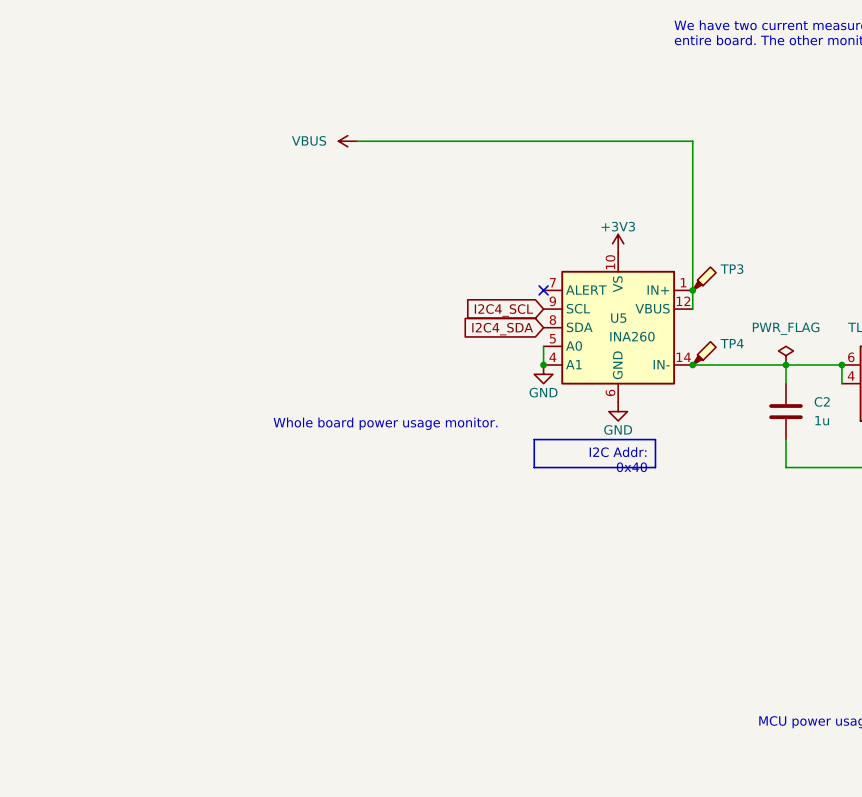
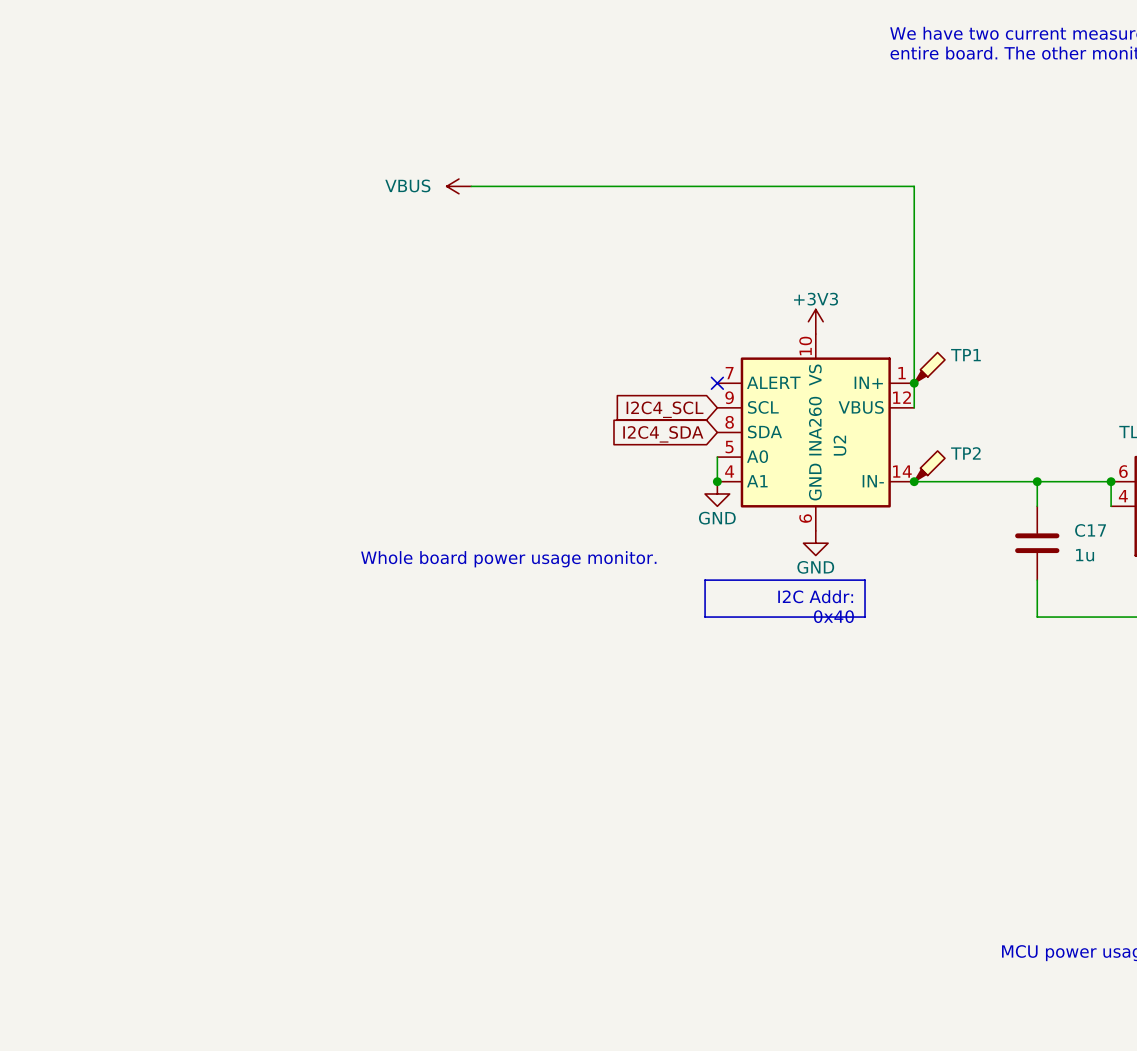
TP3 name: TP3 (732, 269) -> TP1 (965, 355)
U5 name: U5 (618, 318) -> U2 (839, 445)
U5 value rotation: 0° (632, 336) -> 90° counterclockwise (815, 426)
TP4 name: TP4 (732, 343) -> TP2 (965, 453)
power symbol: PWR_FLAG (785, 355) -> none
C2 name: C2 (822, 401) -> C17 (1090, 530)

